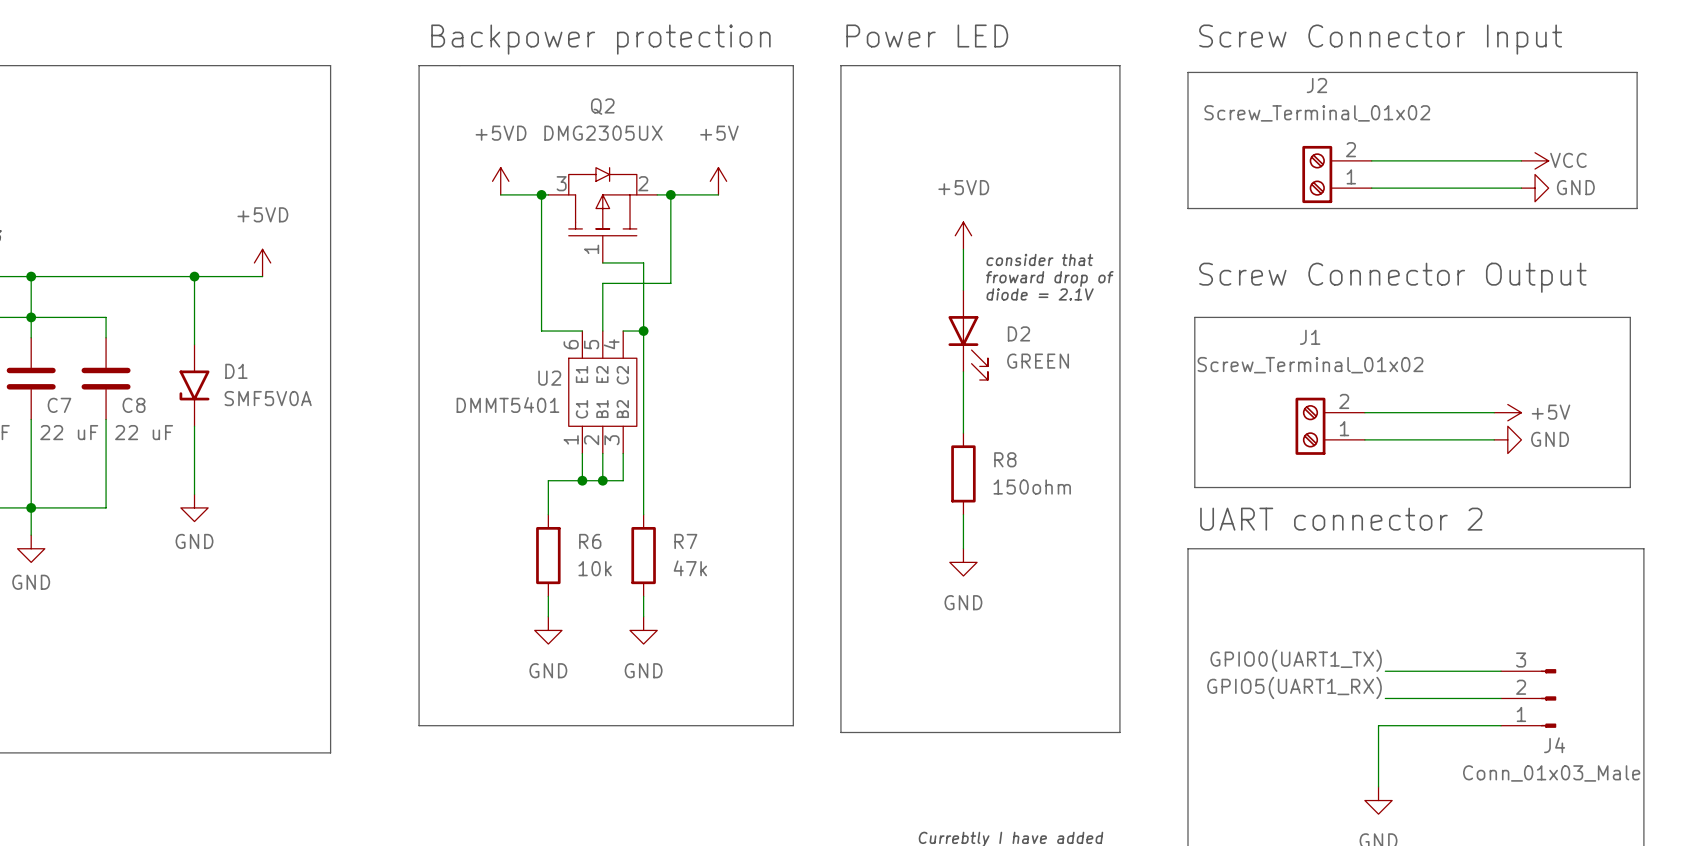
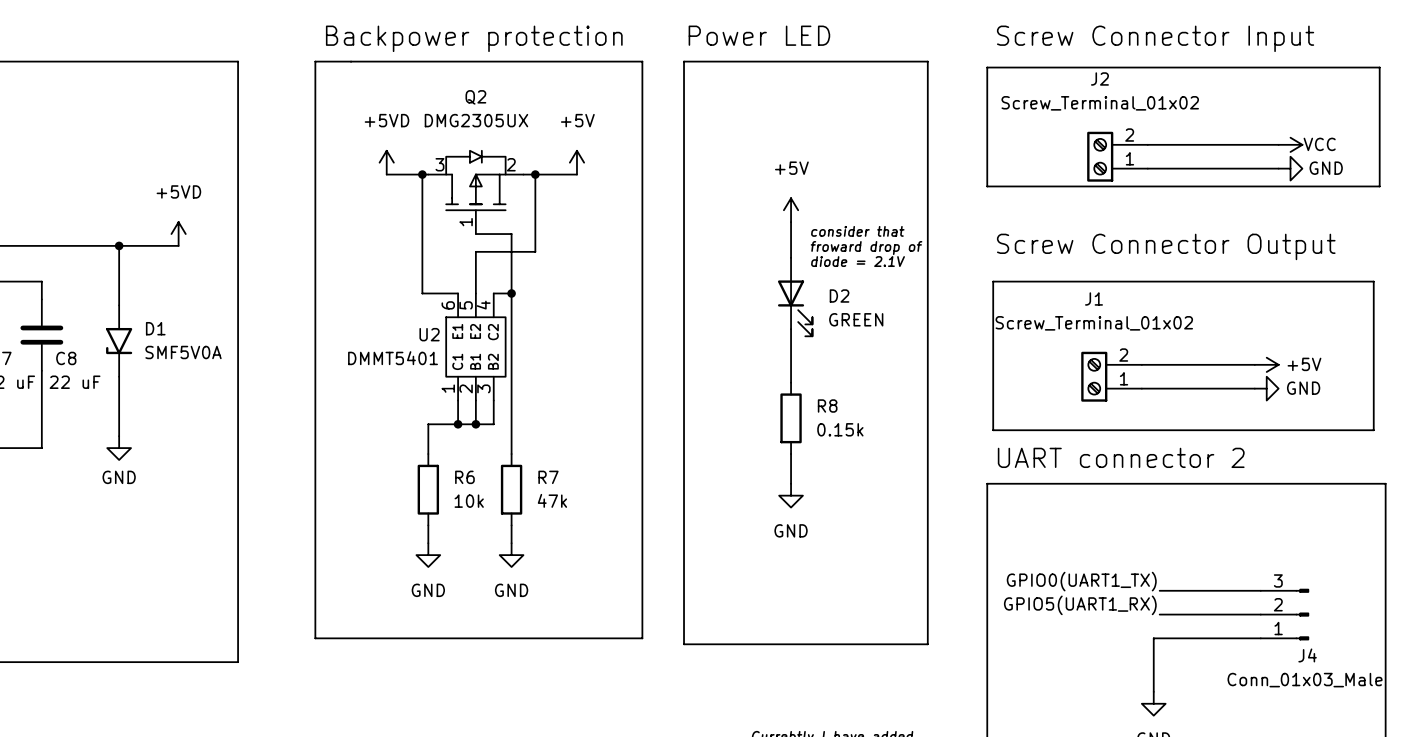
power symbol: +5VD (963, 235) -> +5V (791, 210)
R8 value: 150ohm (1032, 487) -> 0.15k (840, 429)

